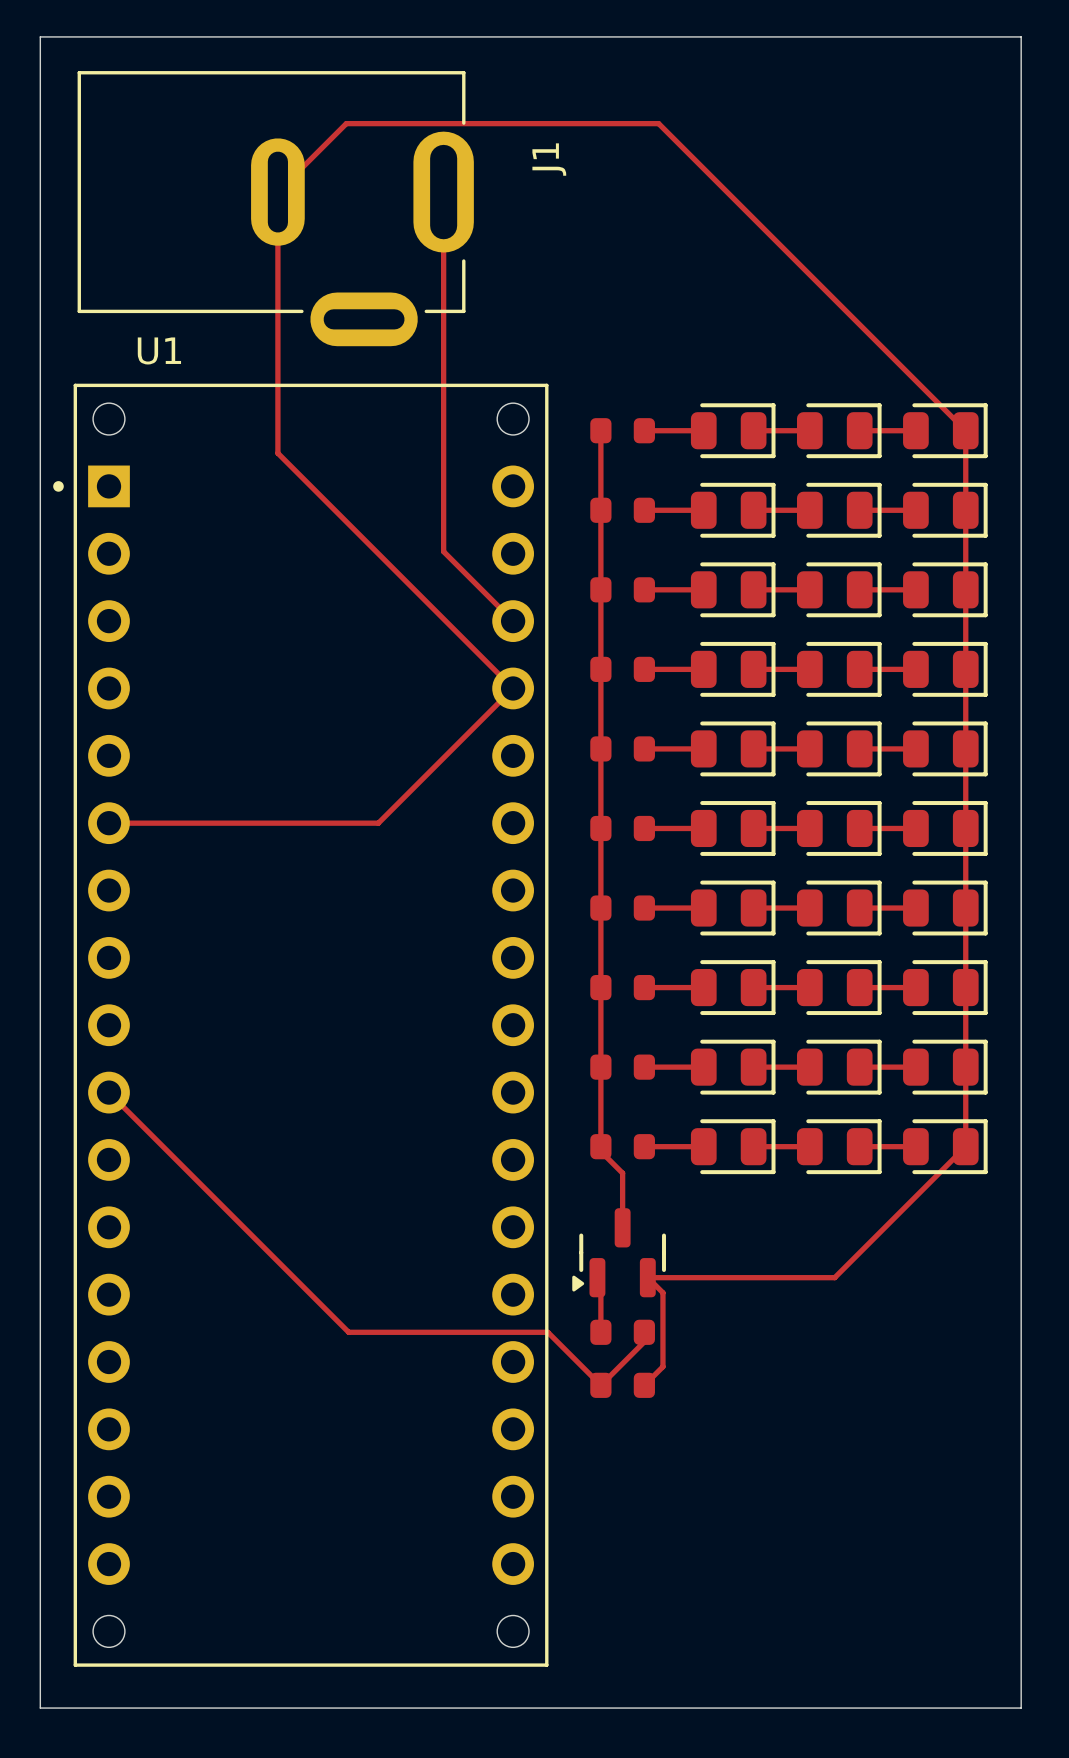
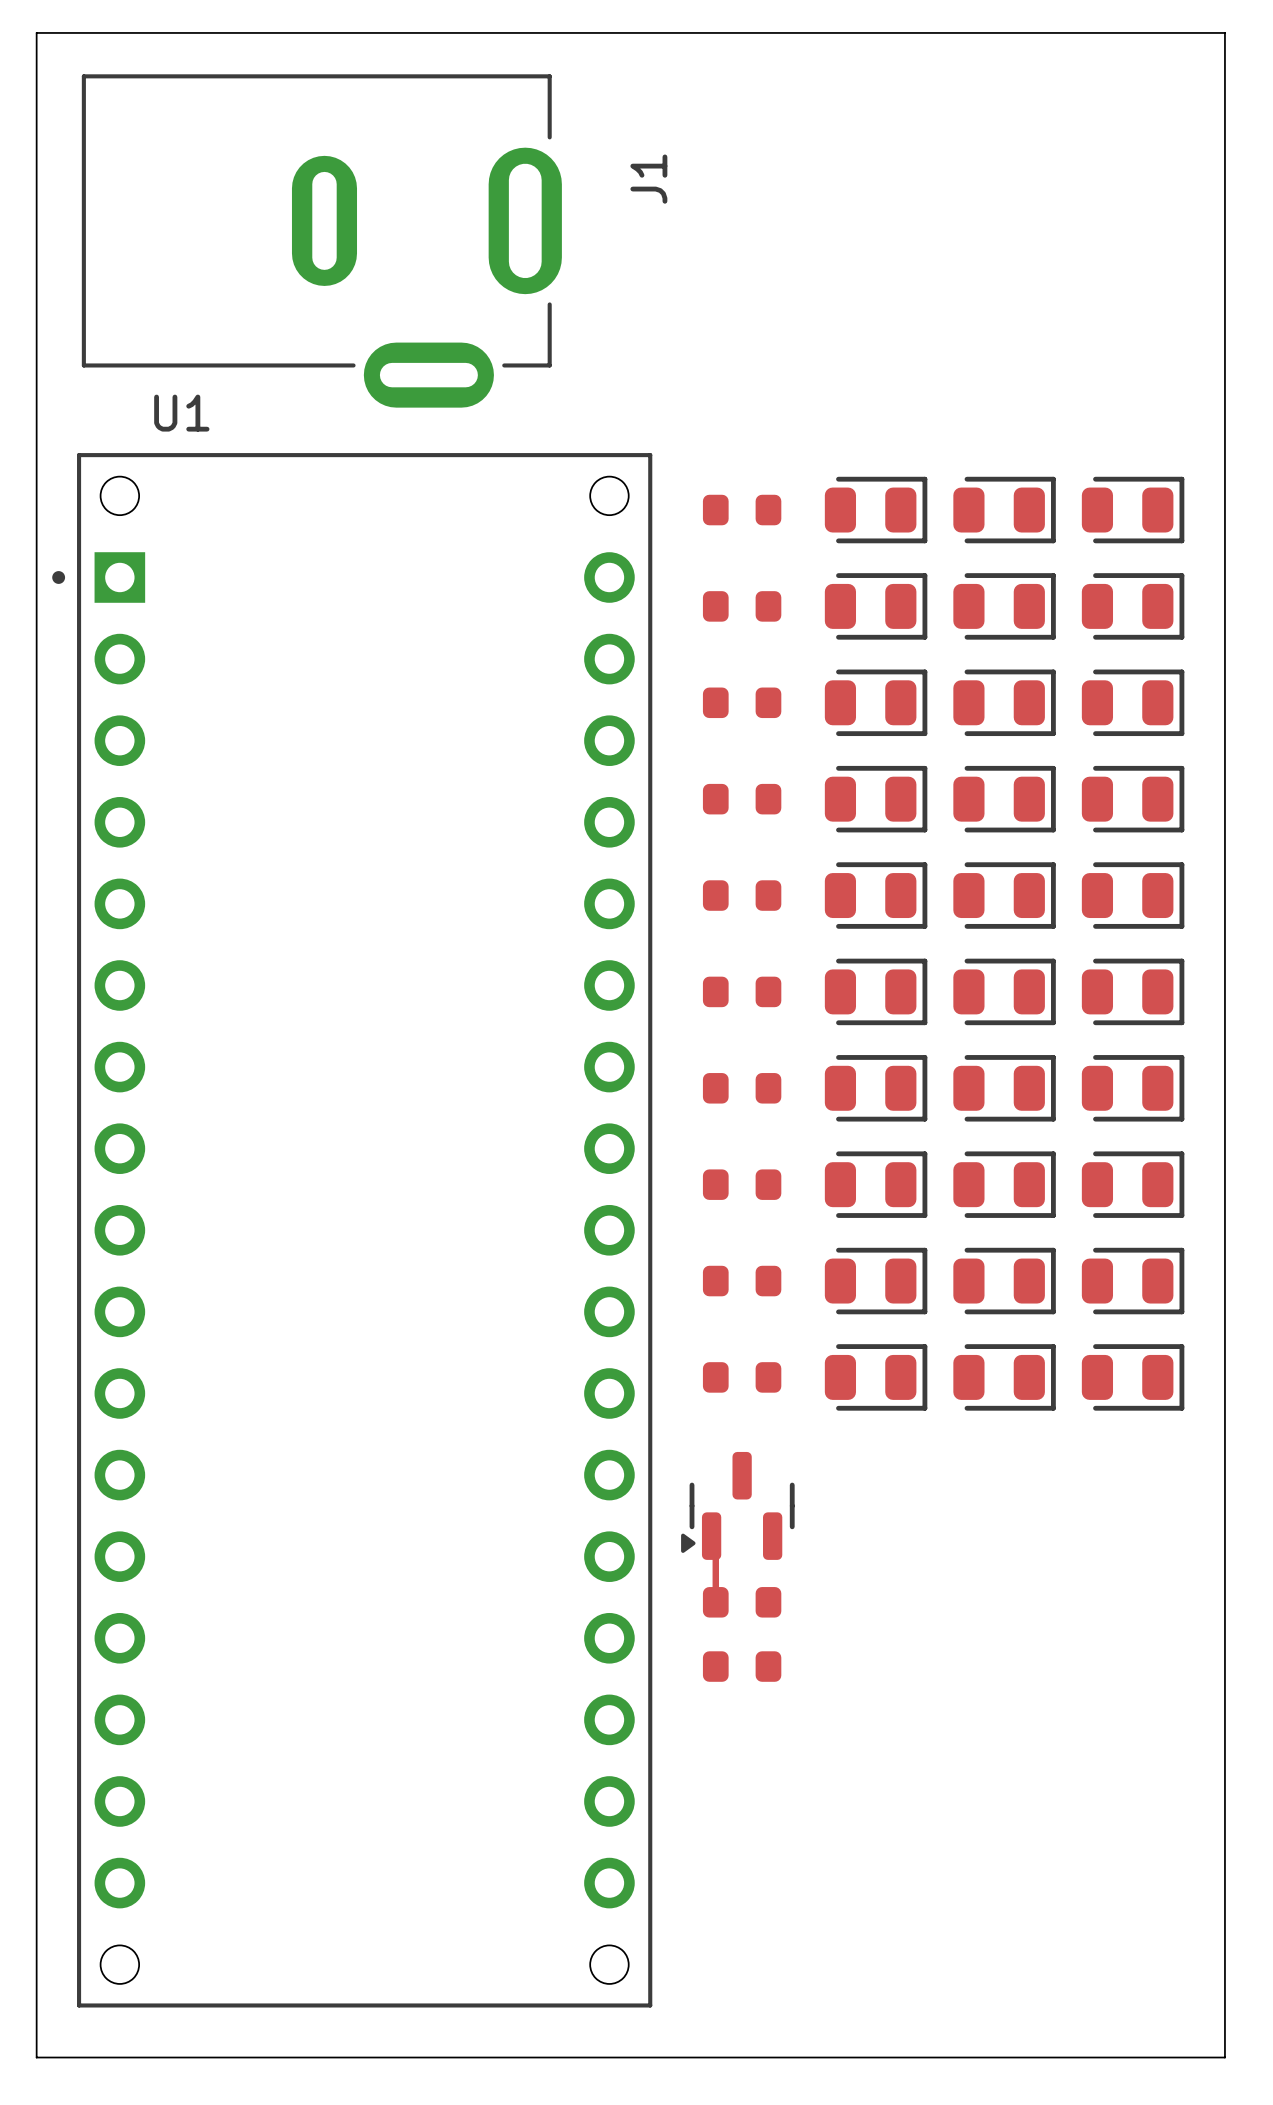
track: (443, 192) (443, 551) (513, 621) -> none
track: (600, 430) (600, 1151) (622, 1173) (622, 1227) -> none
track: (644, 430) (703, 430) -> none
track: (753, 430) (809, 430) -> none
track: (859, 430) (915, 430) -> none
track: (644, 510) (703, 510) -> none
track: (753, 510) (809, 510) -> none
track: (859, 510) (915, 510) -> none
track: (644, 589) (703, 589) -> none
track: (753, 589) (809, 589) -> none
track: (859, 589) (915, 589) -> none
track: (644, 669) (703, 669) -> none
track: (753, 669) (809, 669) -> none
track: (859, 669) (915, 669) -> none
track: (644, 748) (703, 748) -> none
track: (753, 748) (809, 748) -> none
track: (859, 748) (915, 748) -> none
track: (108, 823) (378, 823) (513, 688) (277, 453) (277, 192) (346, 123) (658, 123) (965, 430) (965, 1146) (834, 1277) (647, 1277) (662, 1292) (662, 1366) (644, 1385) -> none
track: (644, 828) (703, 828) -> none
track: (753, 828) (809, 828) -> none
track: (859, 828) (915, 828) -> none
track: (644, 908) (703, 908) -> none
track: (753, 908) (809, 908) -> none
track: (859, 908) (915, 908) -> none
track: (644, 987) (703, 987) -> none
track: (753, 987) (809, 987) -> none
track: (859, 987) (915, 987) -> none
track: (644, 1067) (703, 1067) -> none
track: (753, 1067) (809, 1067) -> none
track: (859, 1067) (915, 1067) -> none
track: (108, 1092) (348, 1332) (547, 1332) (600, 1385) (644, 1341) (644, 1332) -> none
track: (644, 1146) (703, 1146) -> none
track: (753, 1146) (809, 1146) -> none
track: (859, 1146) (915, 1146) -> none

